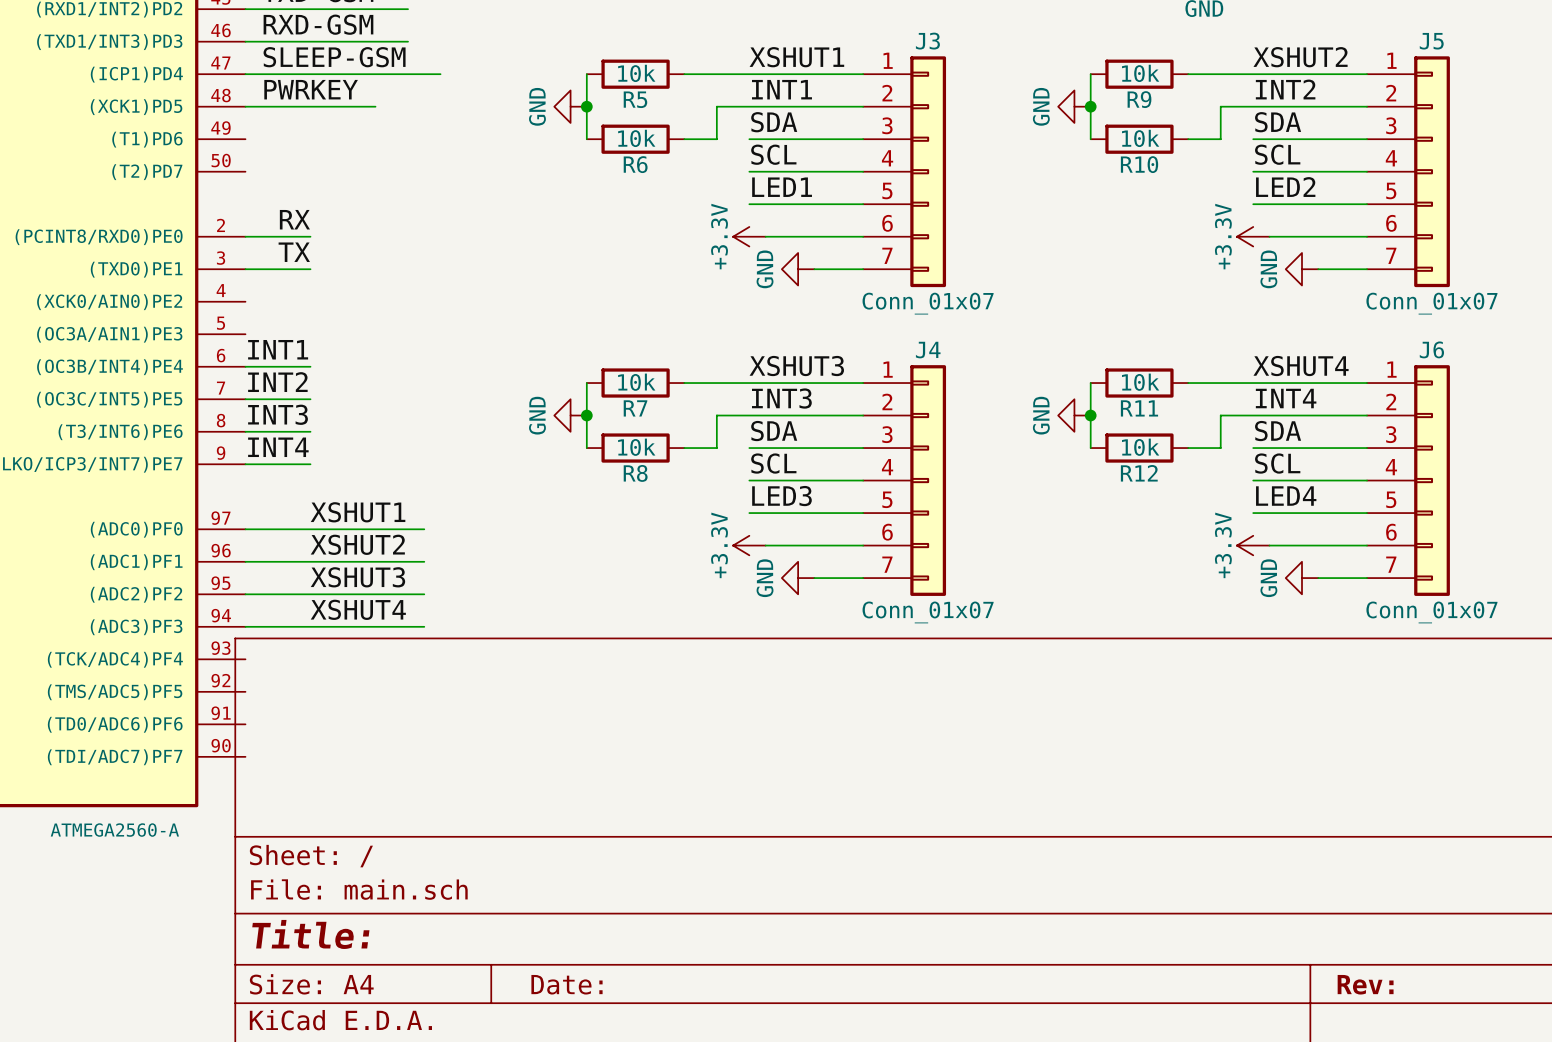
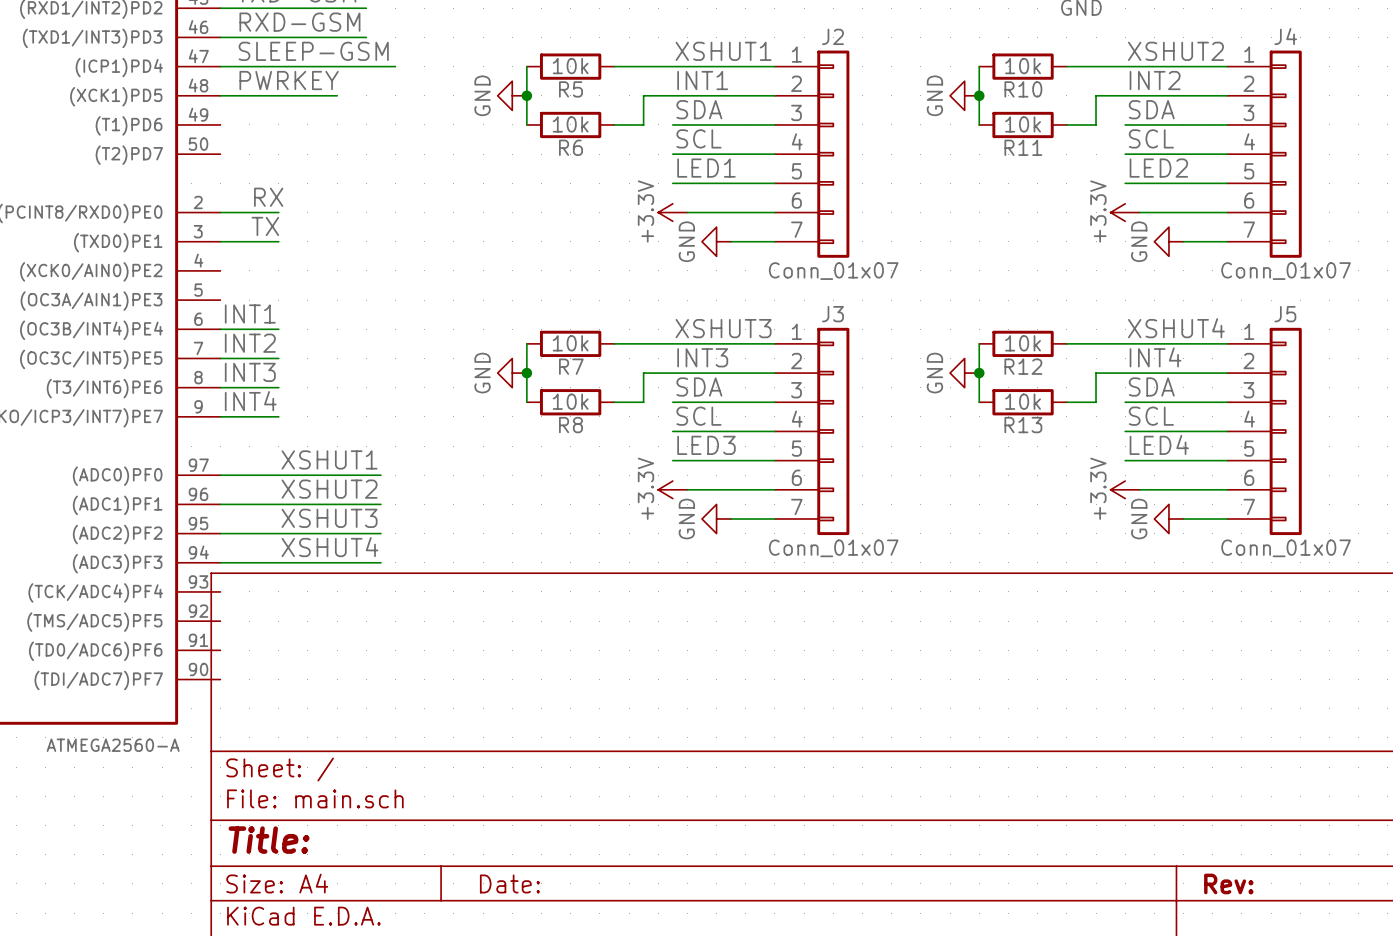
J3 name: J3 (927, 41) -> J2 (832, 36)
J5 name: J5 (1431, 41) -> J4 (1285, 36)
R9 name: R9 (1139, 99) -> R10 (1023, 89)
R10 name: R10 (1139, 164) -> R11 (1023, 147)
J6 name: J6 (1431, 349) -> J5 (1285, 314)
J4 name: J4 (928, 350) -> J3 (832, 314)
R11 name: R11 (1139, 408) -> R12 (1023, 366)
R12 name: R12 (1139, 473) -> R13 (1023, 425)

